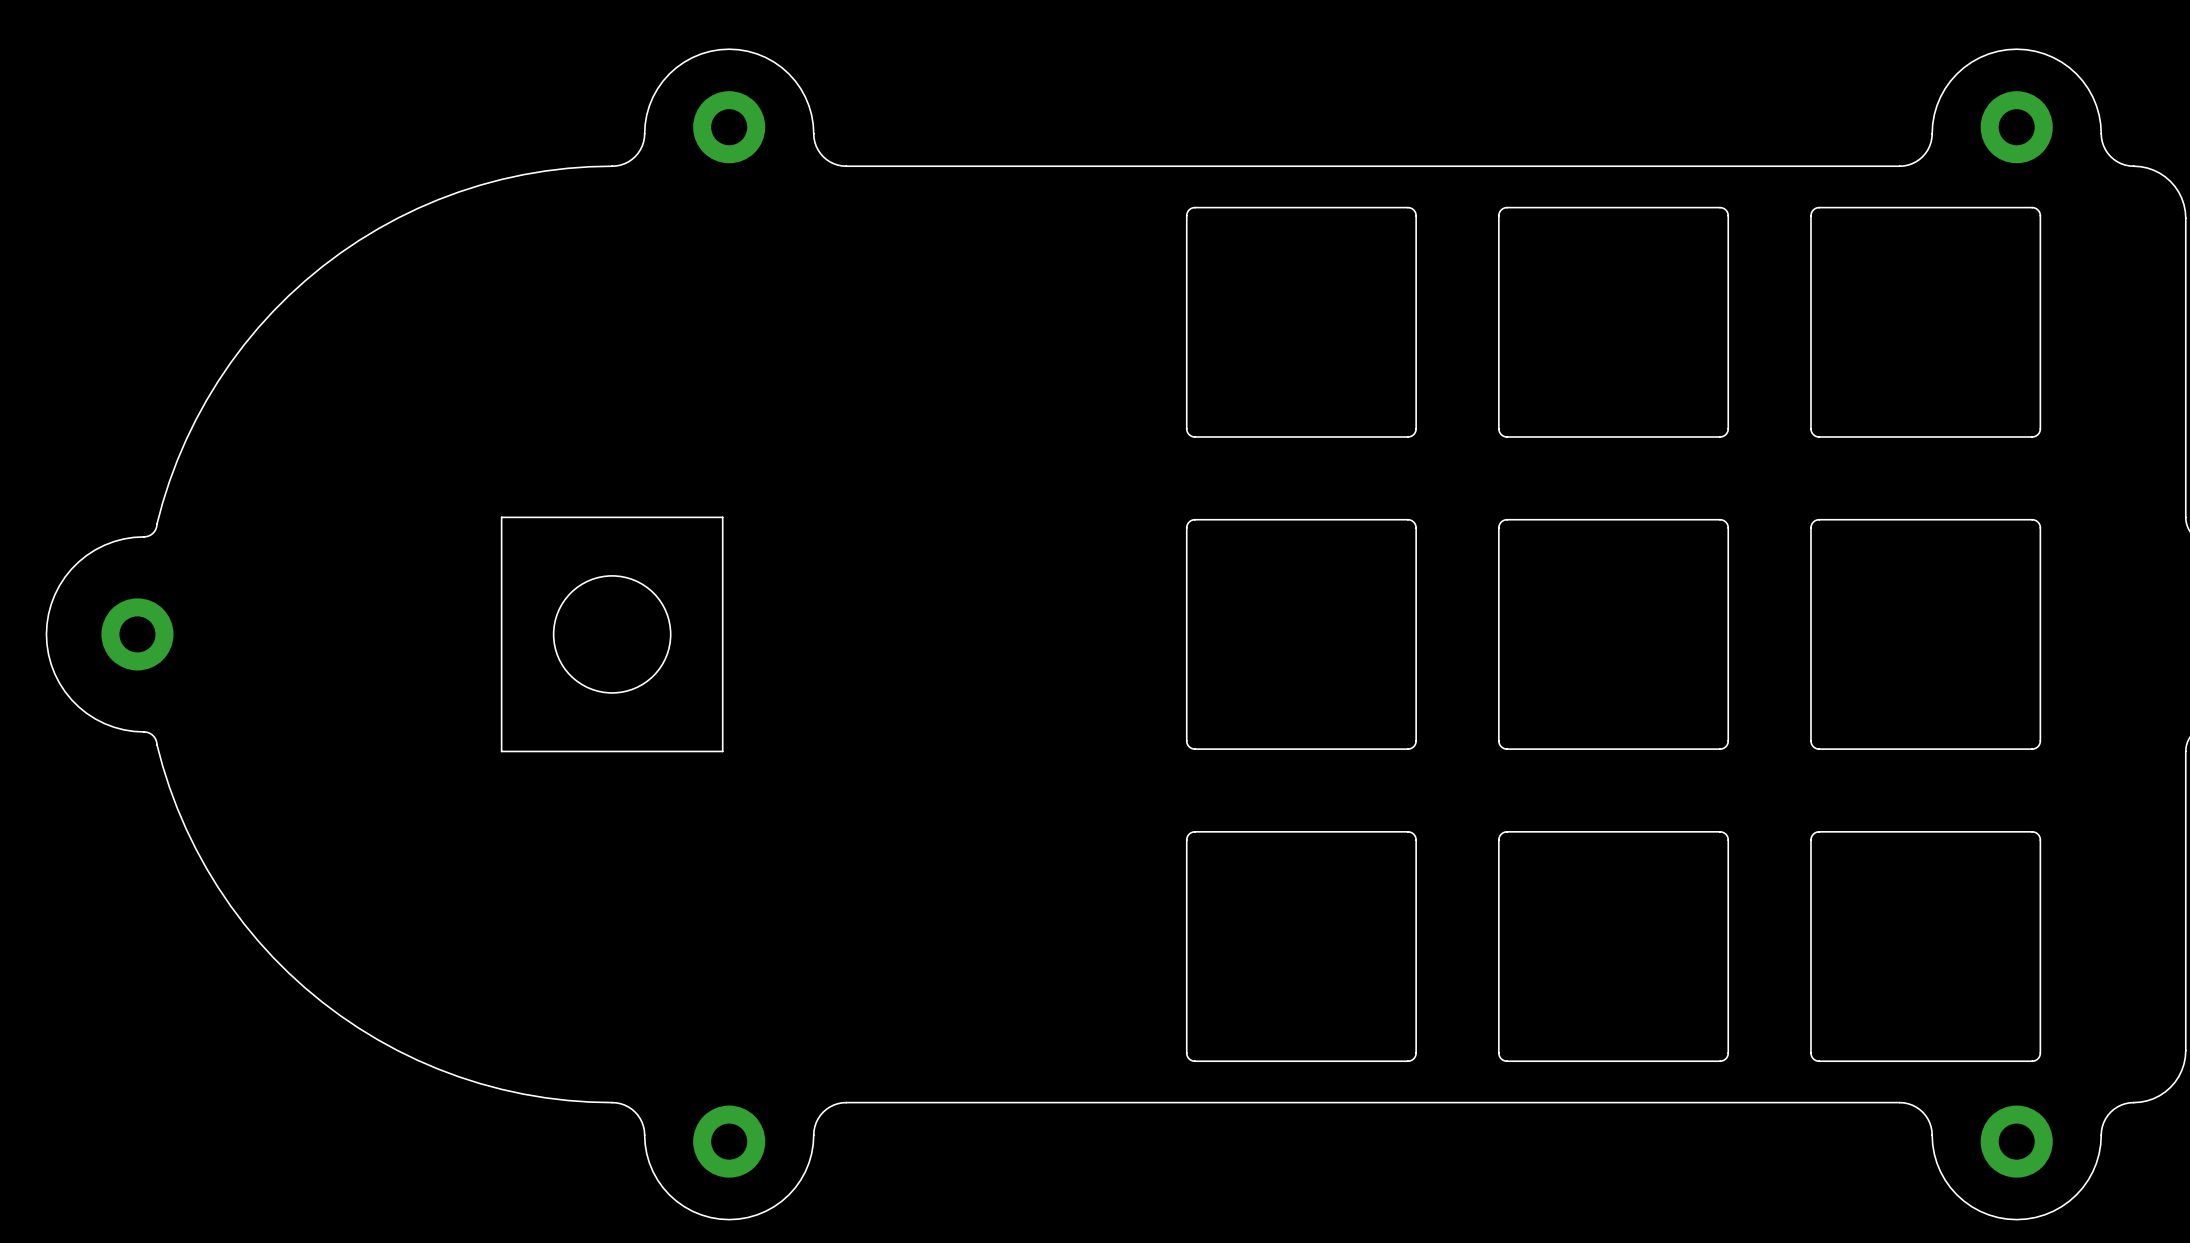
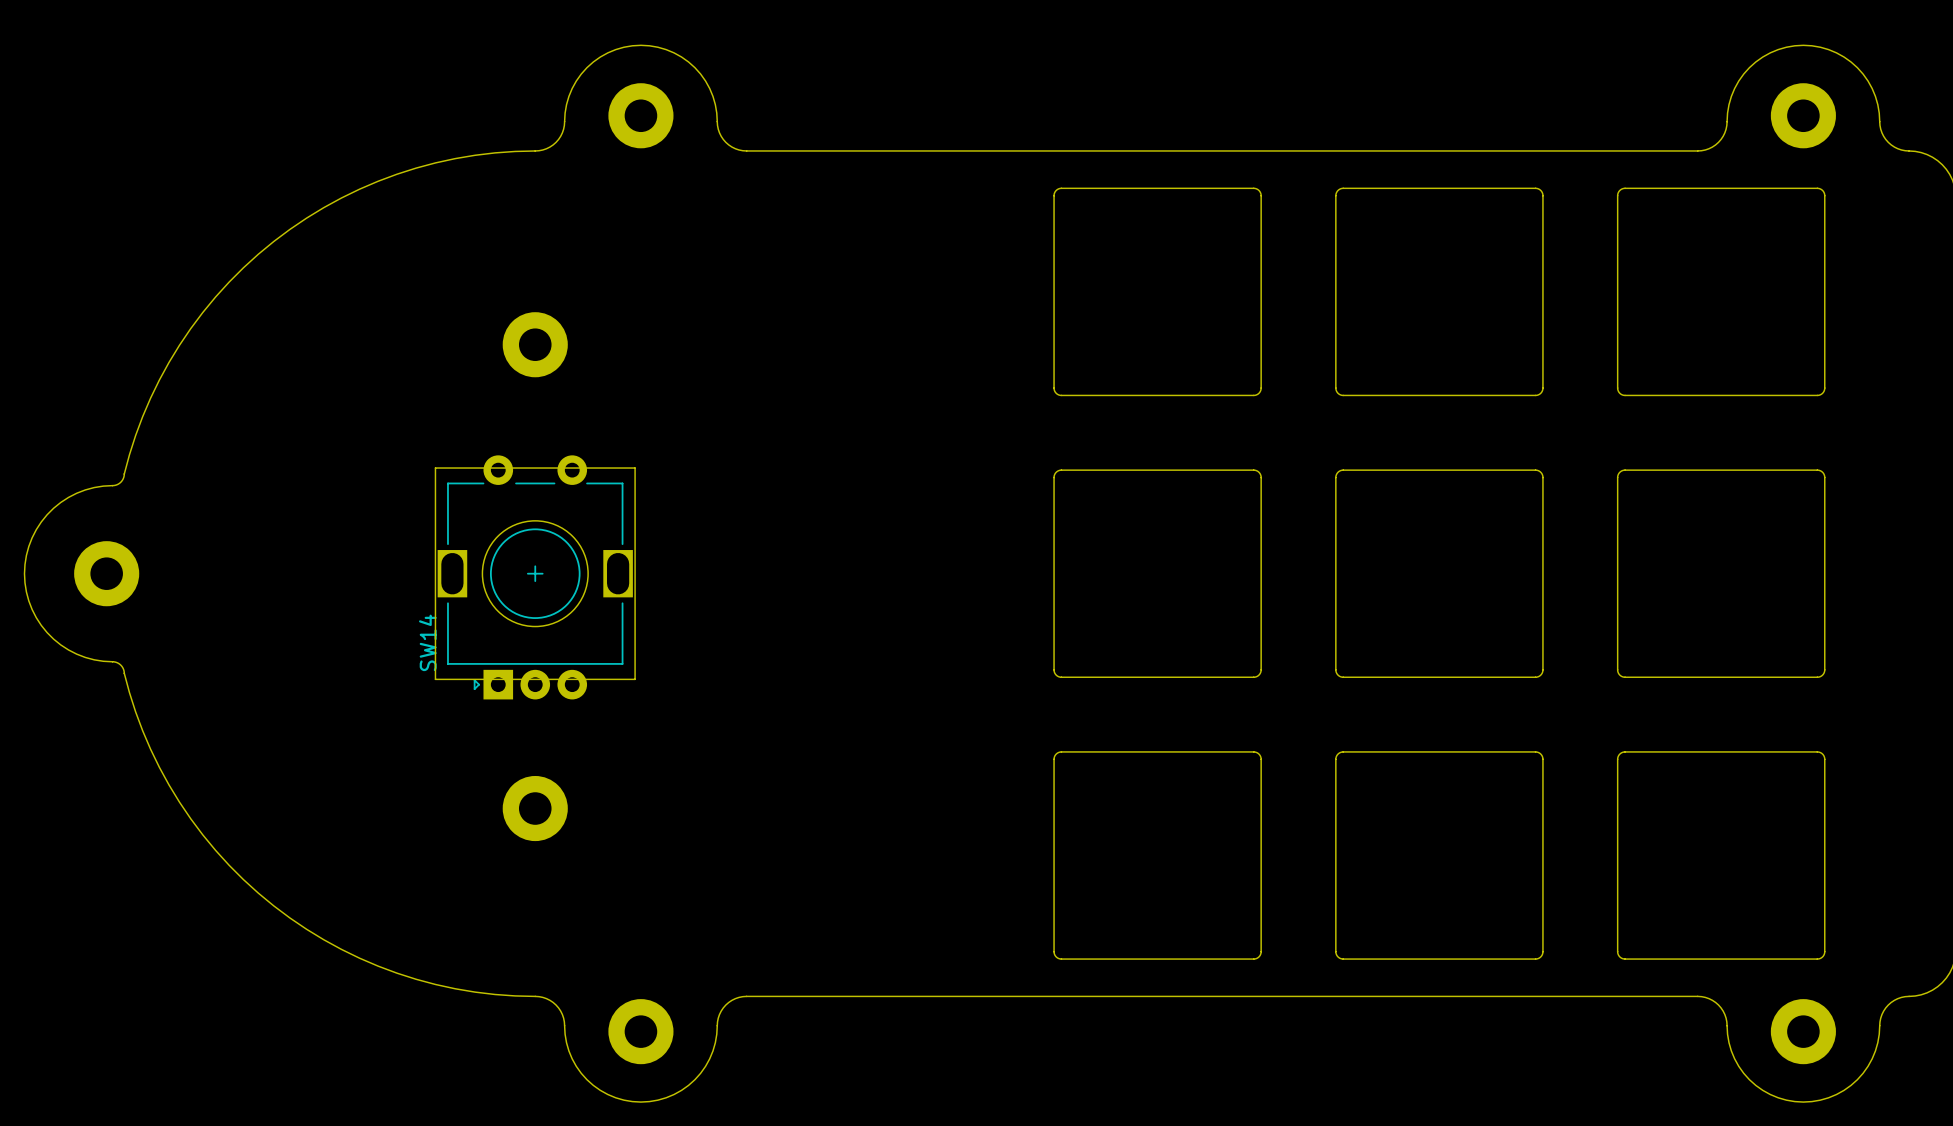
part: none -> (535, 344)
SW14: none -> (535, 577)
part: none -> (535, 808)

